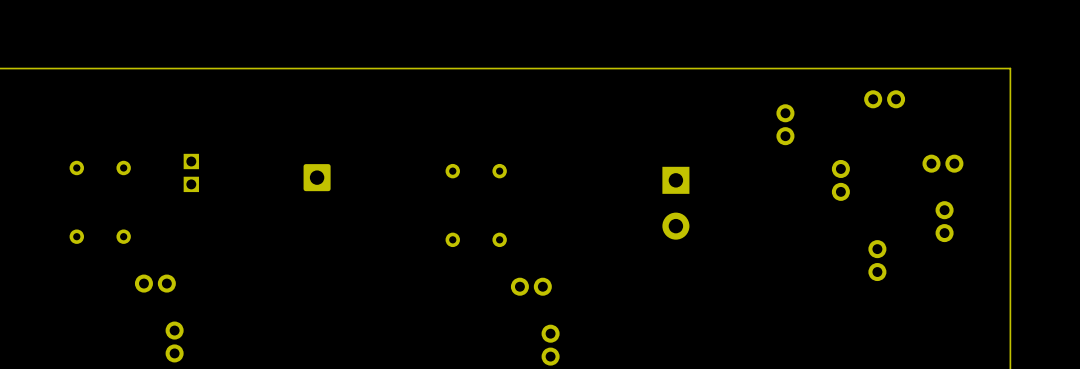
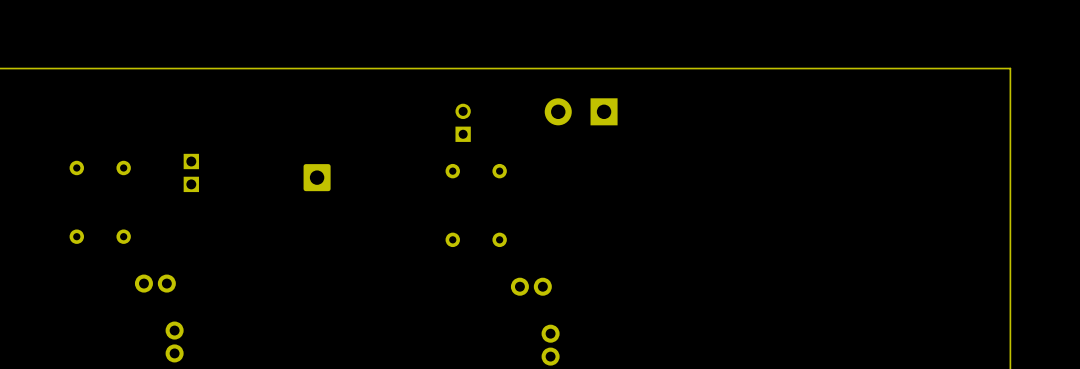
part: (884, 99) -> none
part: none -> (463, 122)
part: (785, 124) -> none
part: (942, 163) -> none
part: (840, 180) -> none
part rotation: 0° (675, 203) -> 90° clockwise (581, 111)
part position: (675, 203) -> (581, 111)
part: (944, 221) -> none
part: (877, 260) -> none

